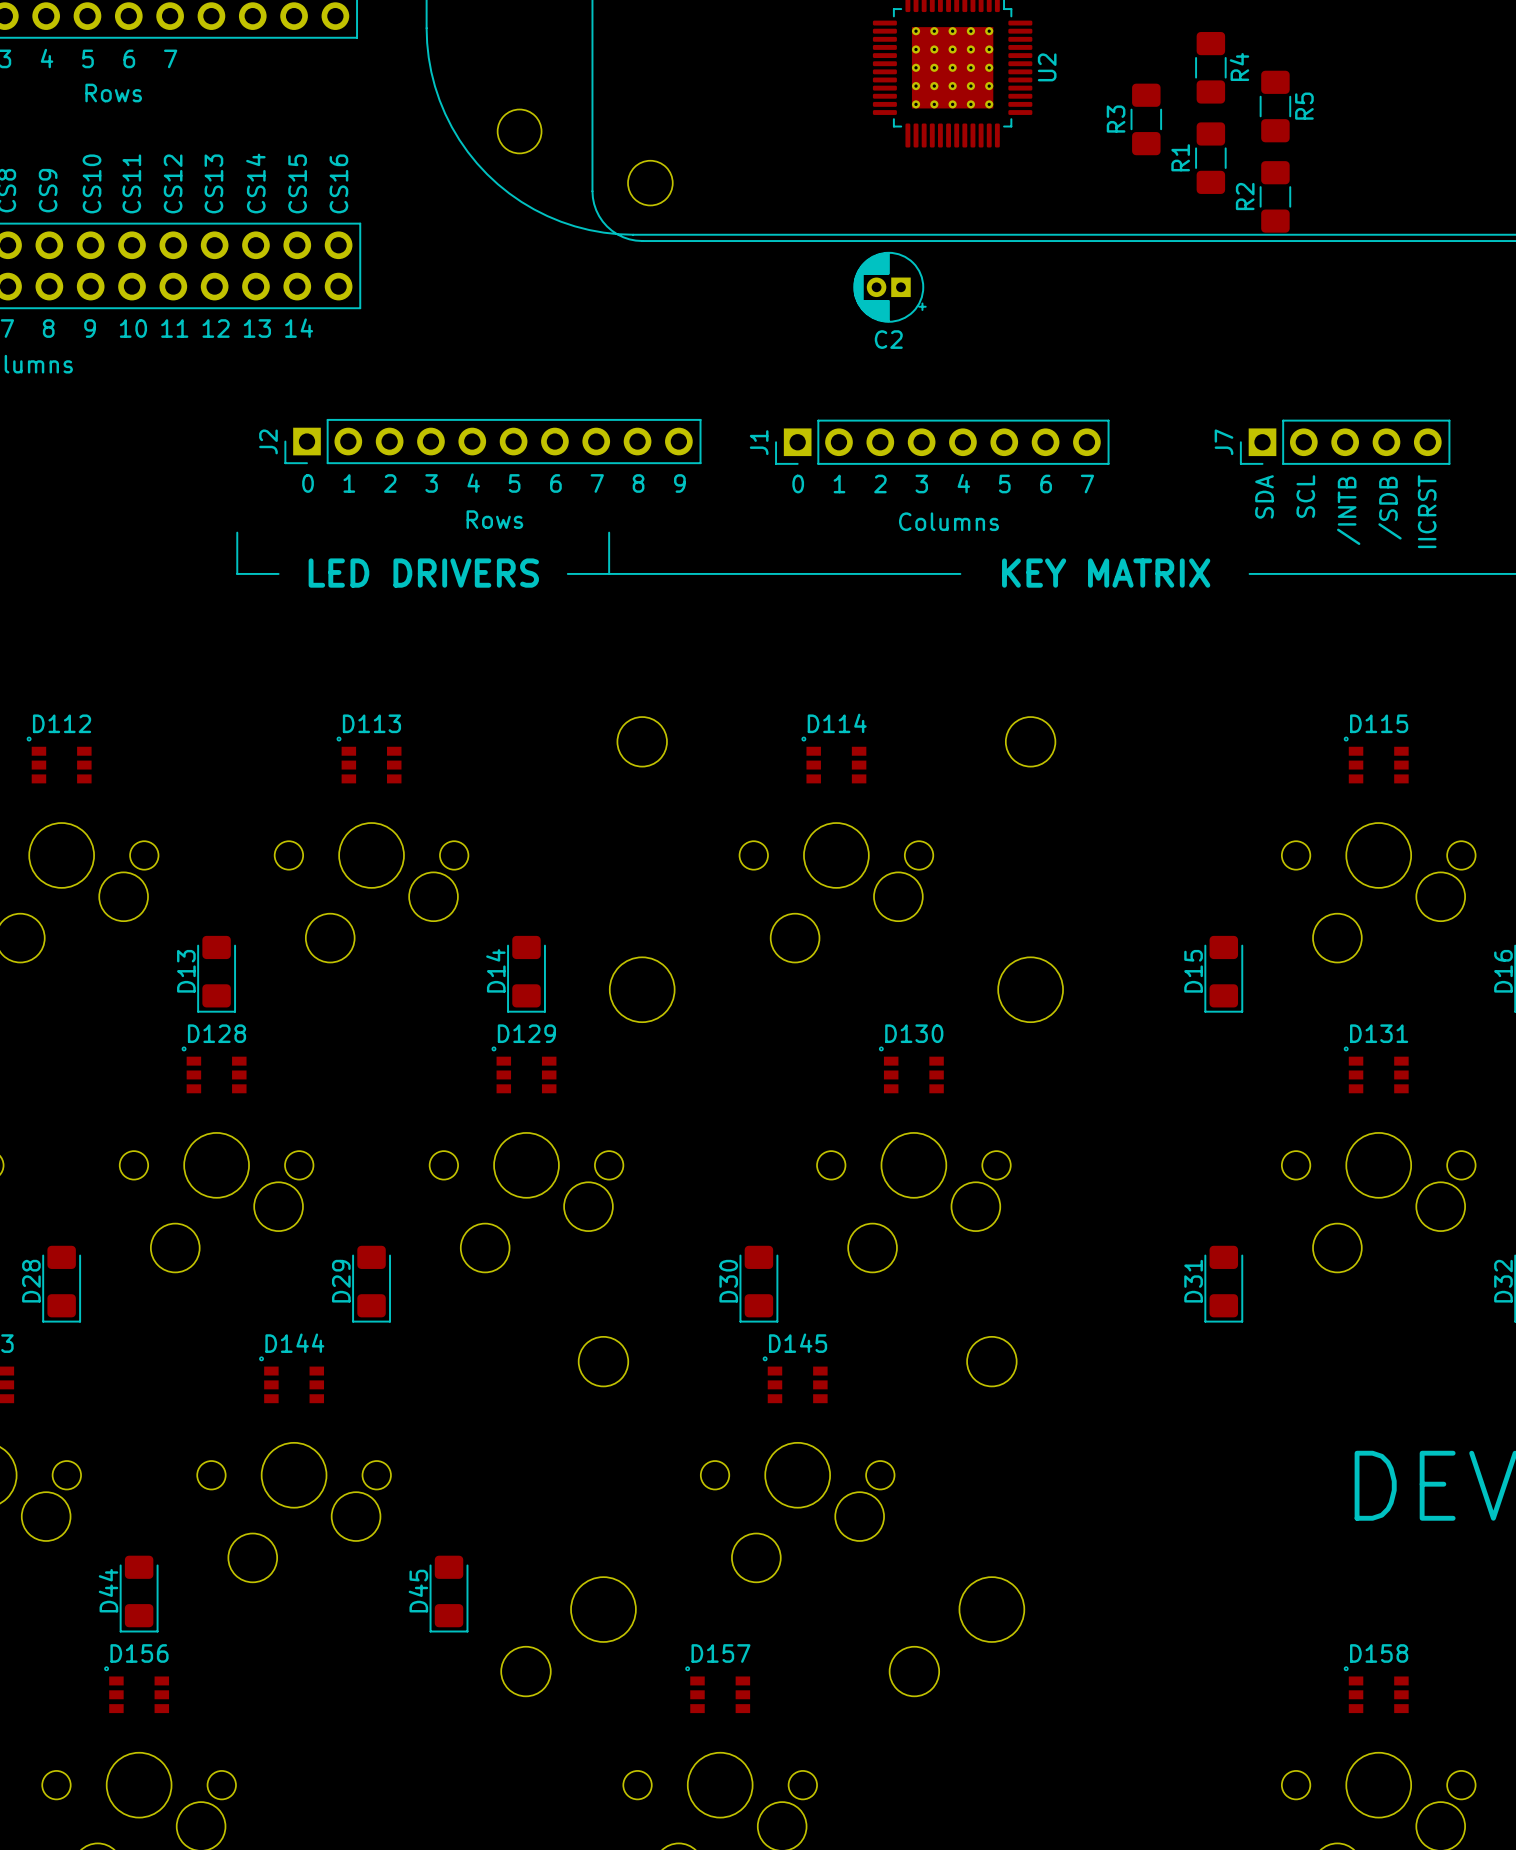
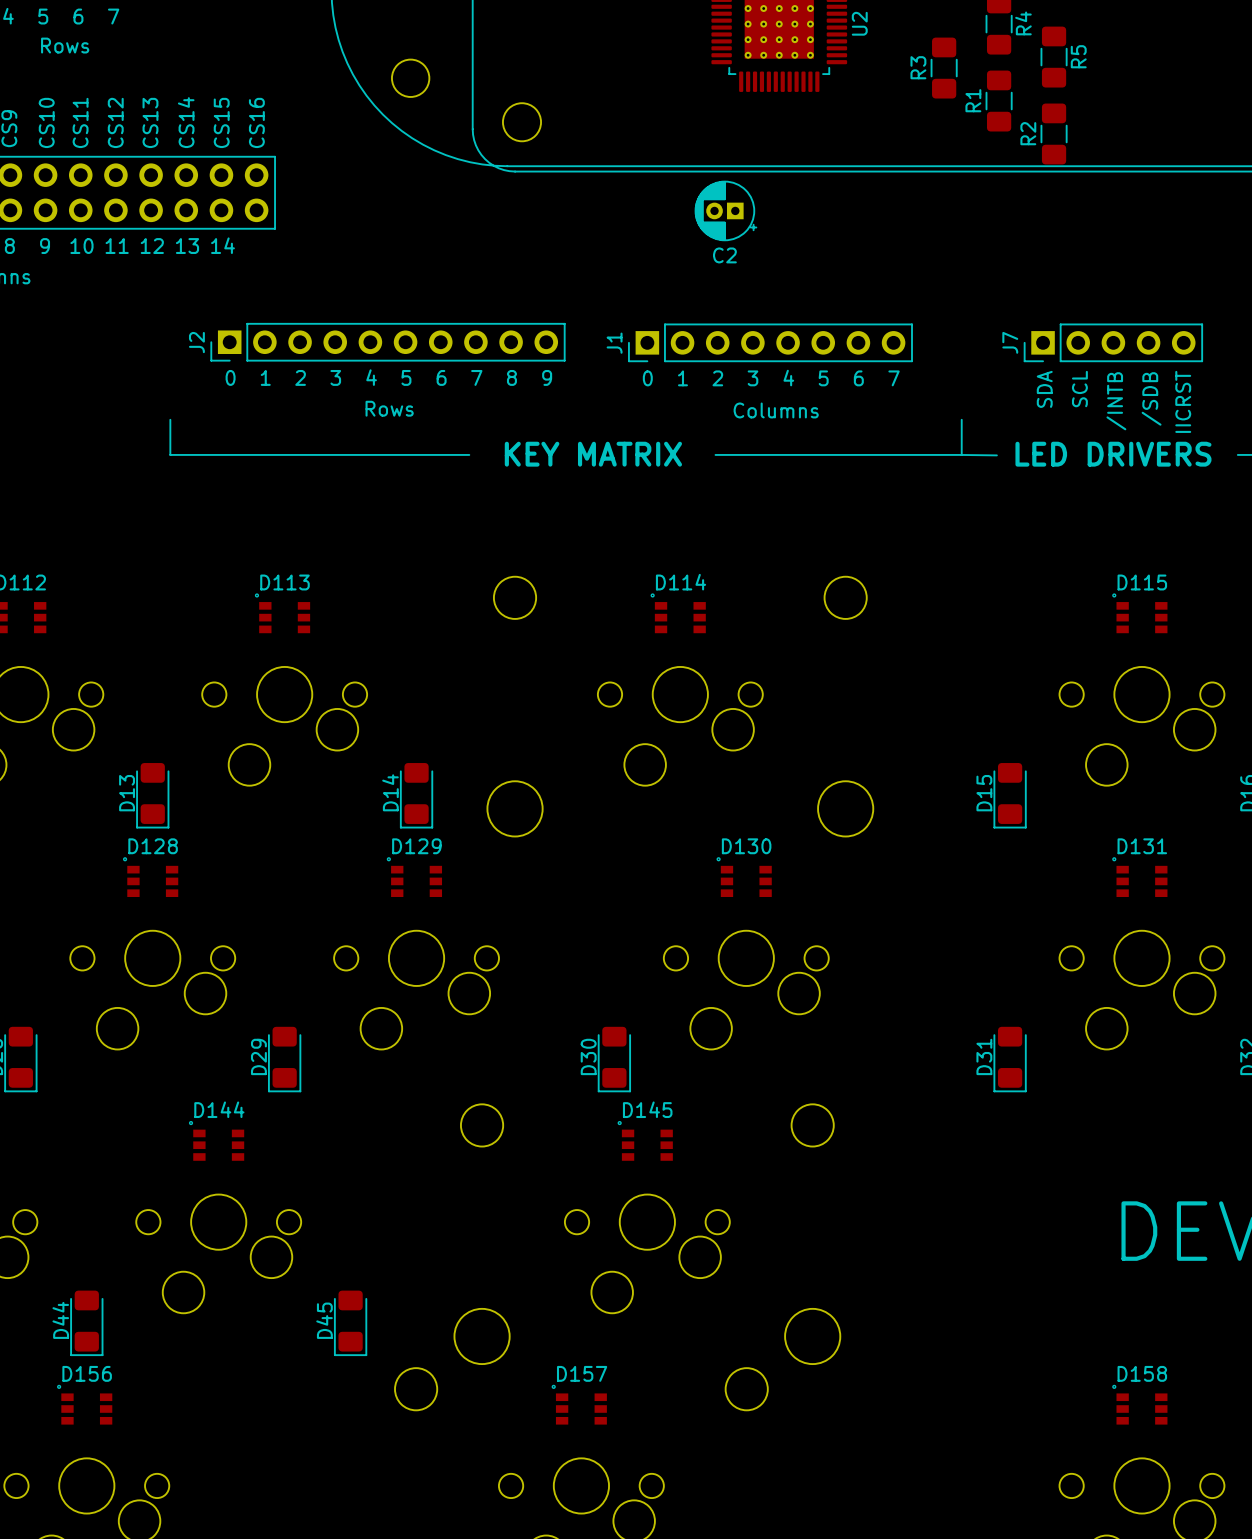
line: (609, 532) (609, 573) -> none
line: none -> (961, 419) (961, 454)
text: LED DRIVERS (423, 573) -> none
line: (588, 573) (877, 573) -> (205, 454) (451, 454)
line: none -> (785, 454) (961, 454)
text position: KEY MATRIX (1106, 573) -> KEY MATRIX (593, 454)
line: none -> (961, 454) (996, 455)
line: (1249, 573) (1491, 573) -> none
text: none -> LED DRIVERS (1113, 454)

